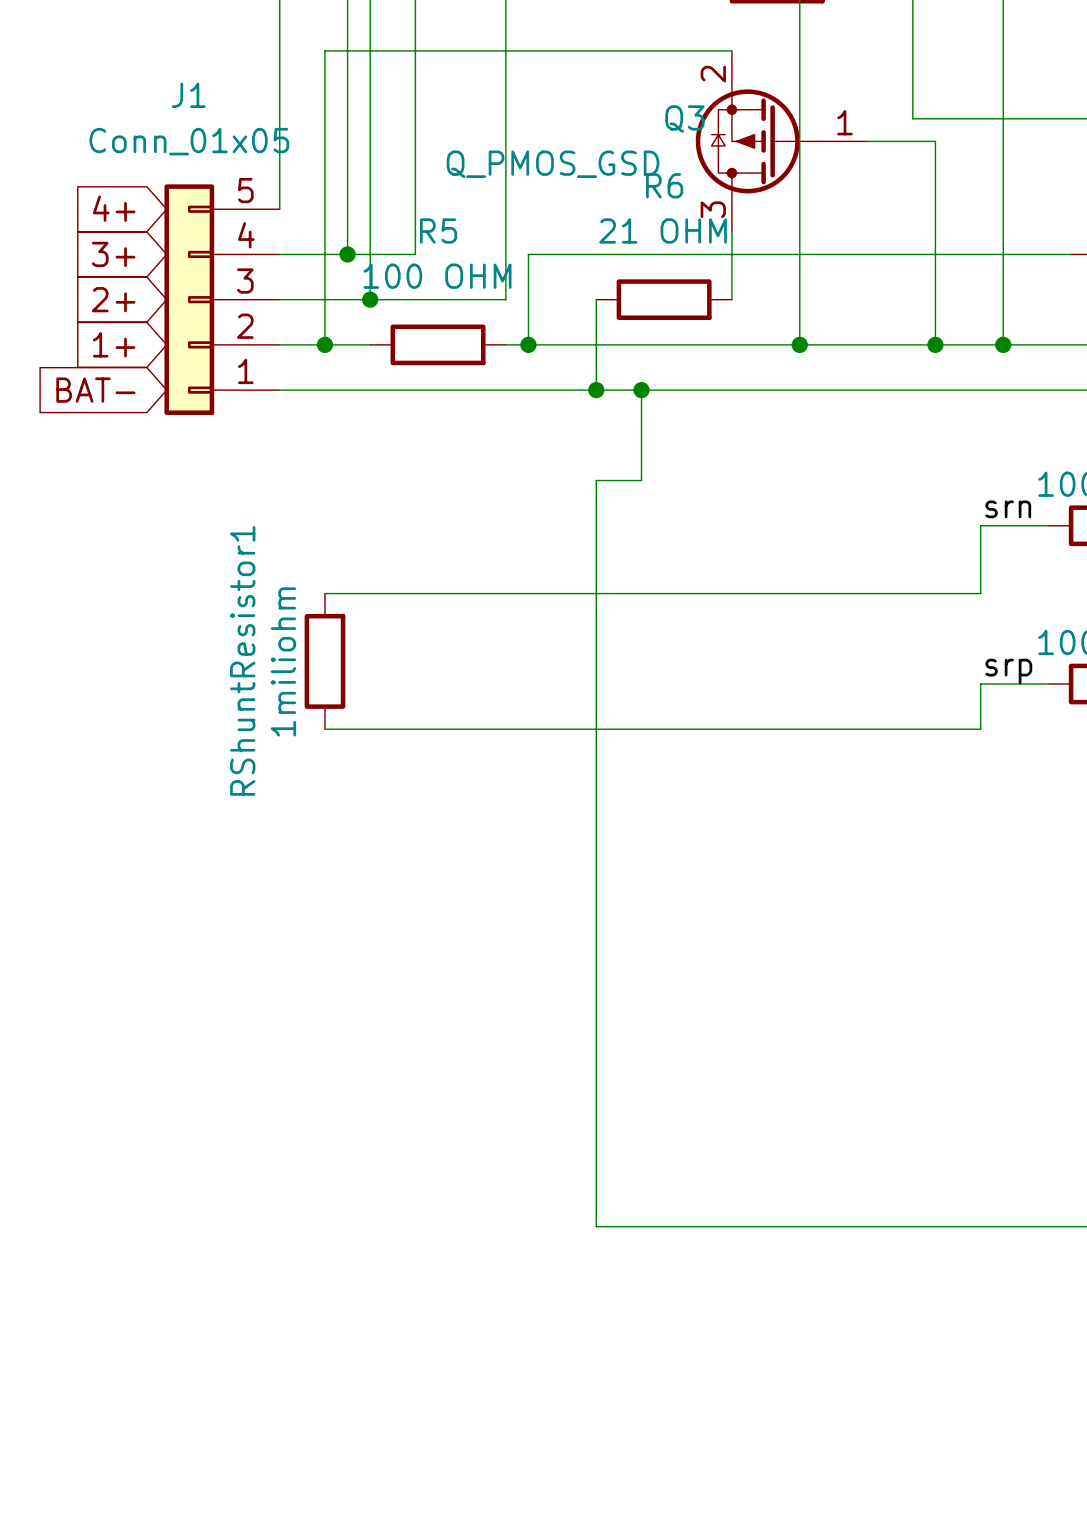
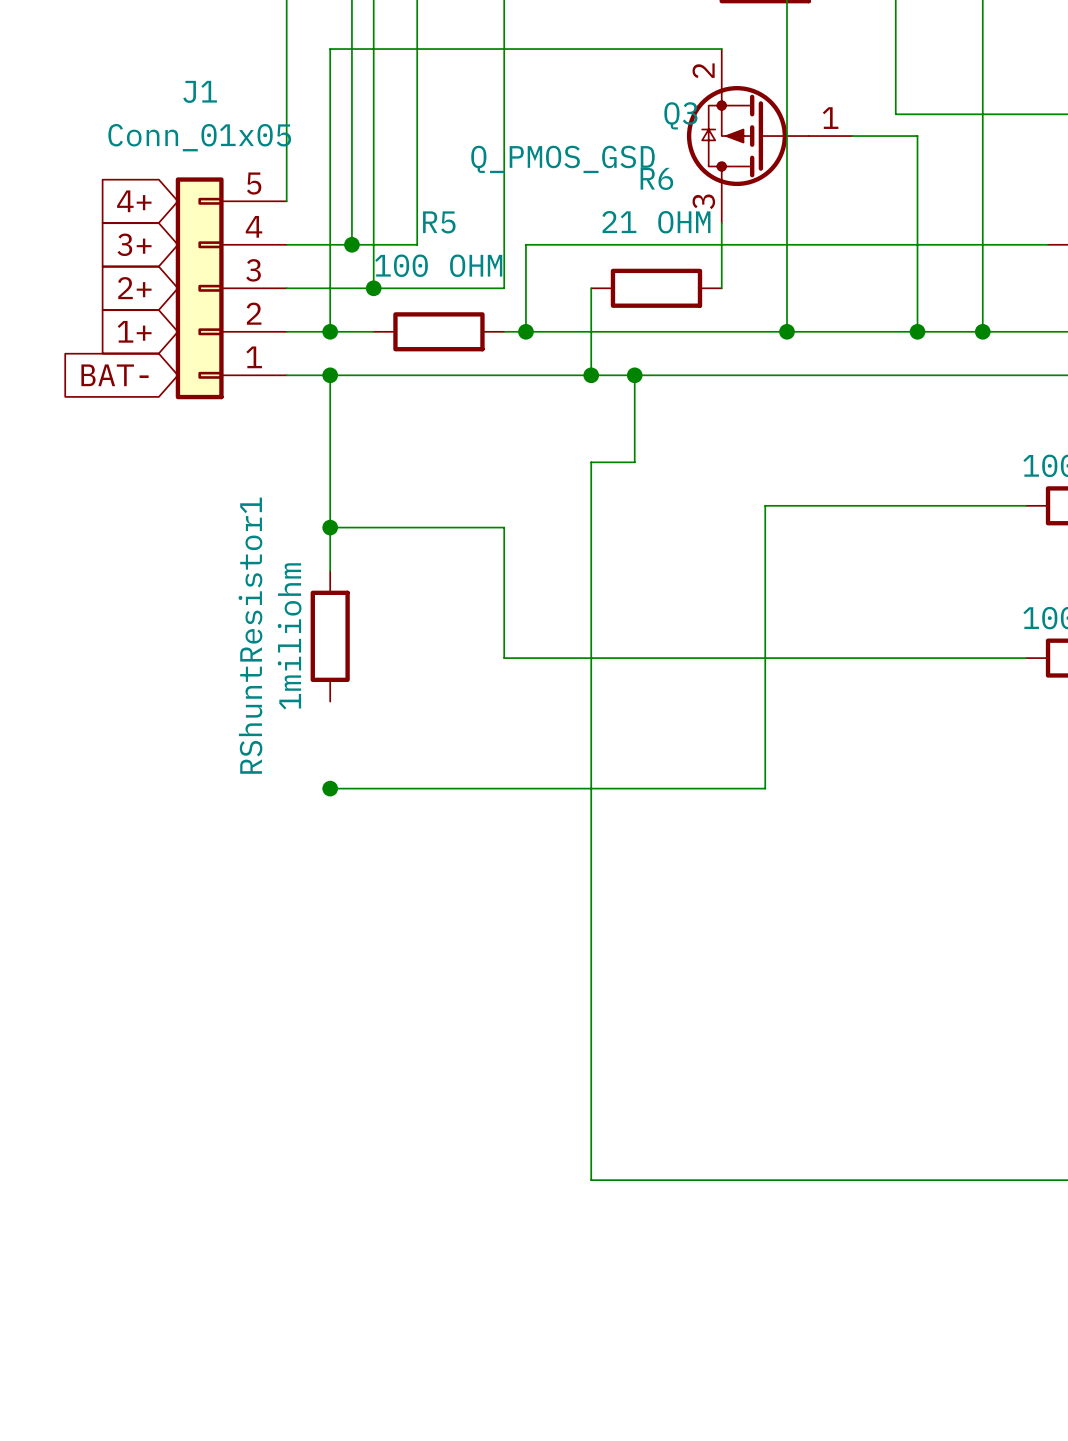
wire: none -> (330, 375) (330, 571)
junction: none -> (330, 375)
label: srn (1008, 509) -> none
wire: (980, 525) (980, 593) (324, 593) -> (961, 505) (765, 505) (765, 788) (330, 788)
junction: none -> (330, 527)
label: srp (1008, 671) -> none
wire: (980, 684) (980, 729) (324, 729) -> (961, 658) (504, 658) (504, 527) (330, 527)
junction: none -> (330, 788)

